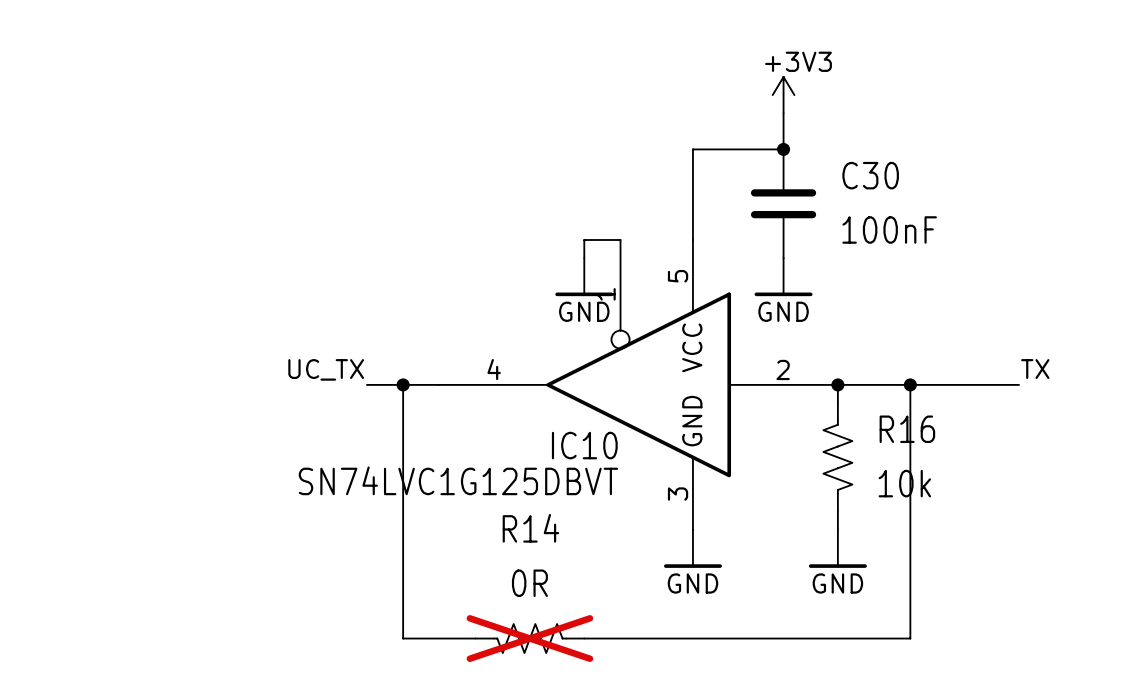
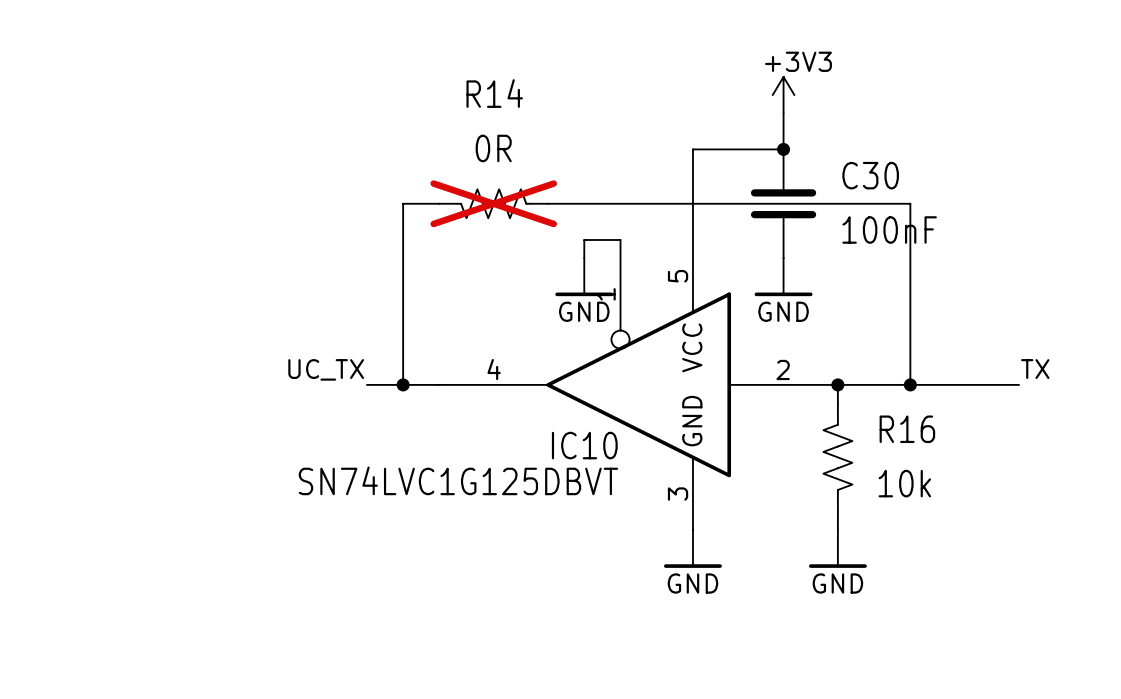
wire: (403, 384) (403, 638) (475, 638) -> (403, 384) (403, 203) (439, 203)
wire: (910, 384) (910, 638) (584, 638) -> (910, 384) (910, 203) (548, 203)
R14 position: (529, 638) -> (493, 203)

